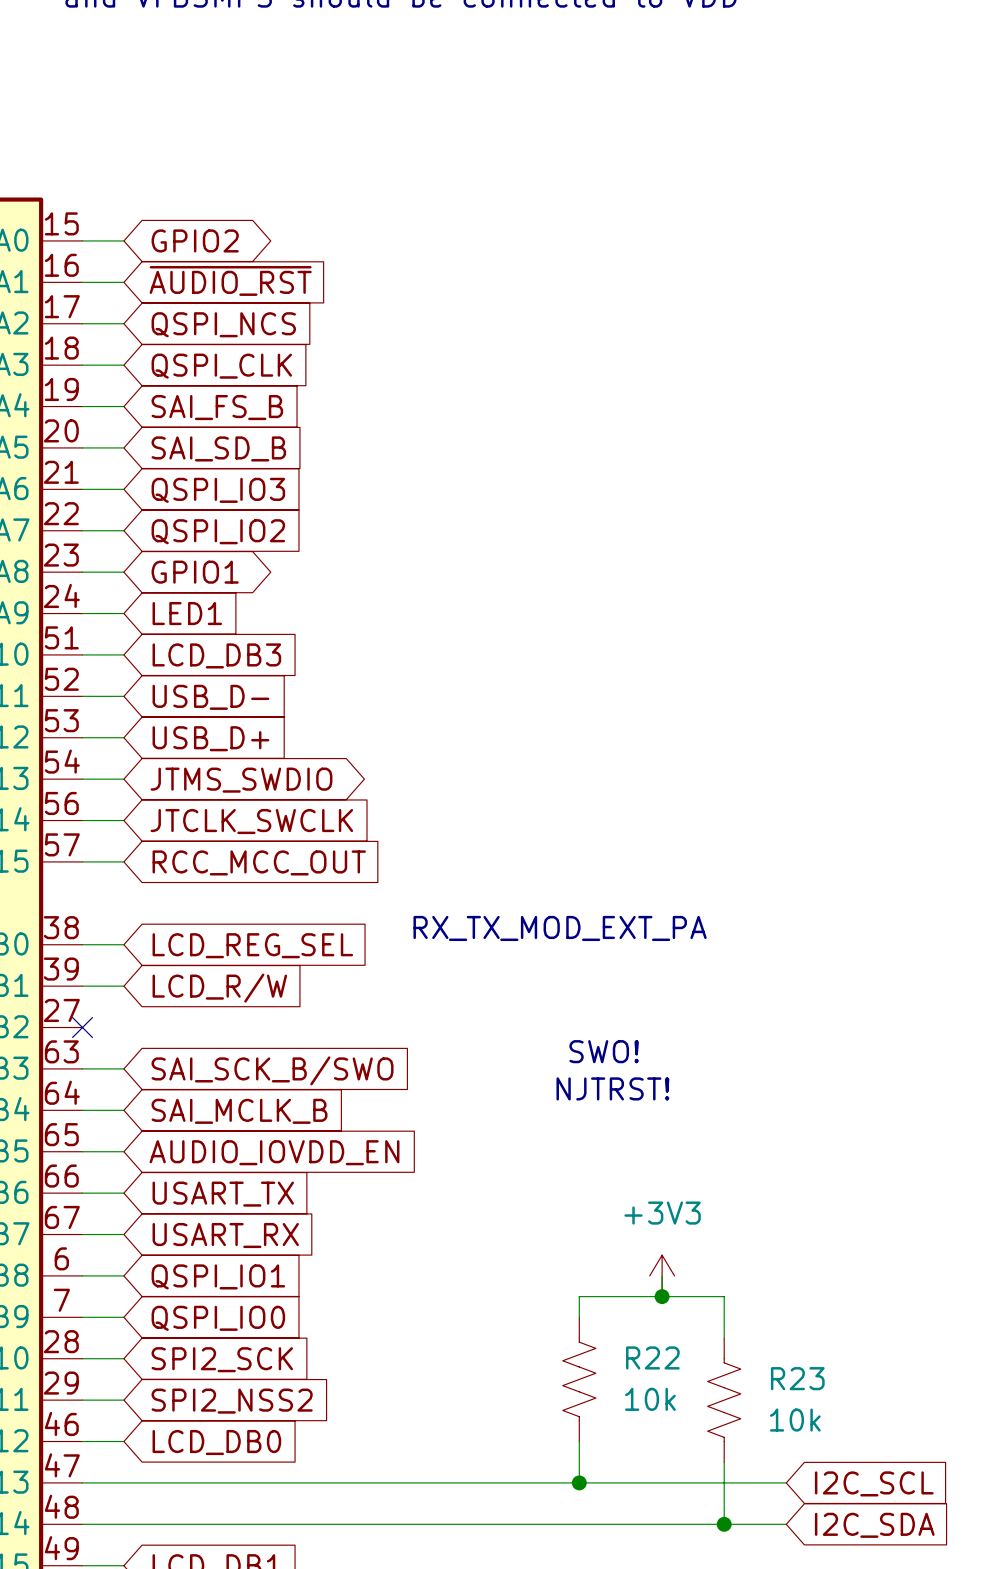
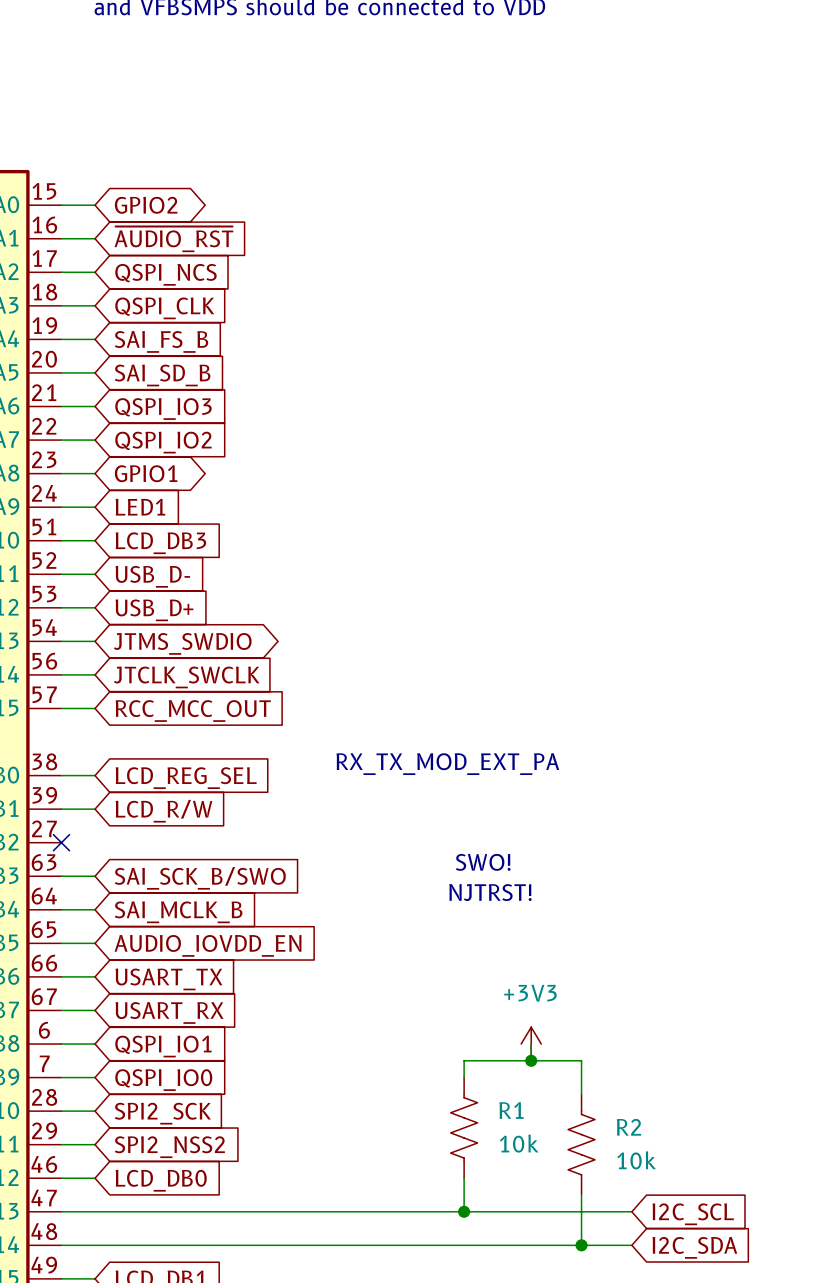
R22 name: R22 (652, 1357) -> R1 (511, 1110)
R23 name: R23 (797, 1378) -> R2 (628, 1127)

